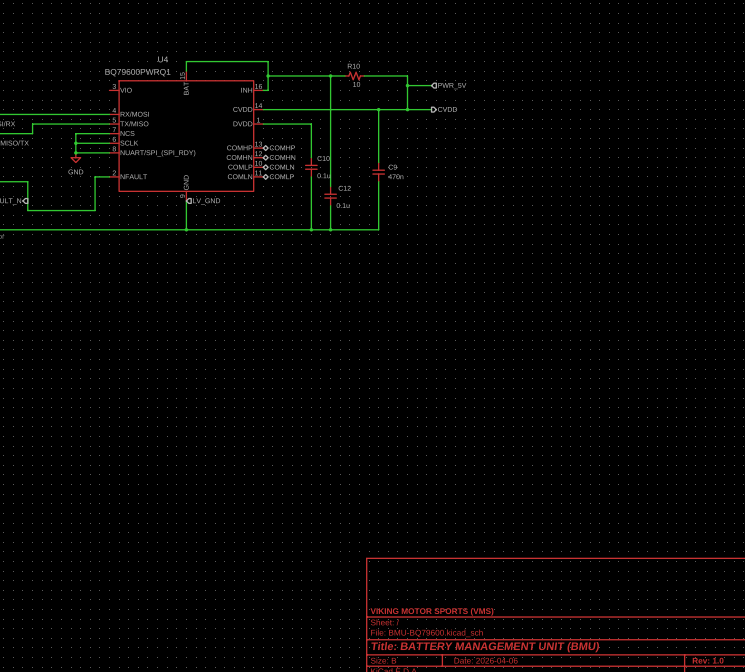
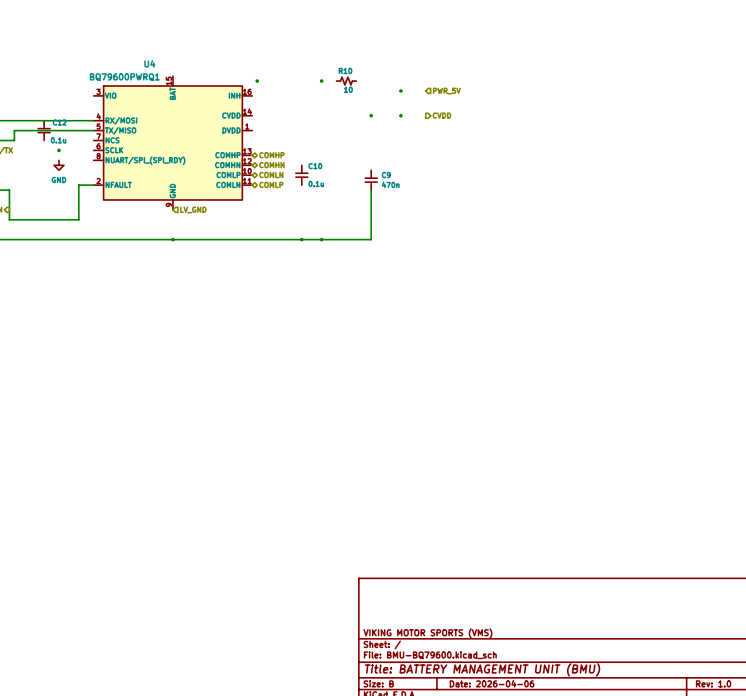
wire: (186, 71) (186, 61) (268, 61) (268, 90) (263, 90) -> none
wire: (268, 75) (345, 75) -> none
wire: (330, 75) (330, 186) -> none
wire: (364, 75) (407, 75) (407, 109) -> none
wire: (407, 85) (431, 85) -> none
wire: (263, 109) (431, 109) -> none
wire: (378, 109) (378, 162) -> none
wire: (263, 124) (311, 124) (311, 157) -> none
wire: (109, 133) (75, 133) (75, 152) (109, 152) -> none
wire: (75, 143) (109, 143) -> none
junction: (75, 152) -> none
wire: (311, 176) (311, 229) -> none
part position: (330, 196) -> (44, 130)
wire: (186, 200) (186, 229) -> none
wire: (330, 205) (330, 229) -> none

